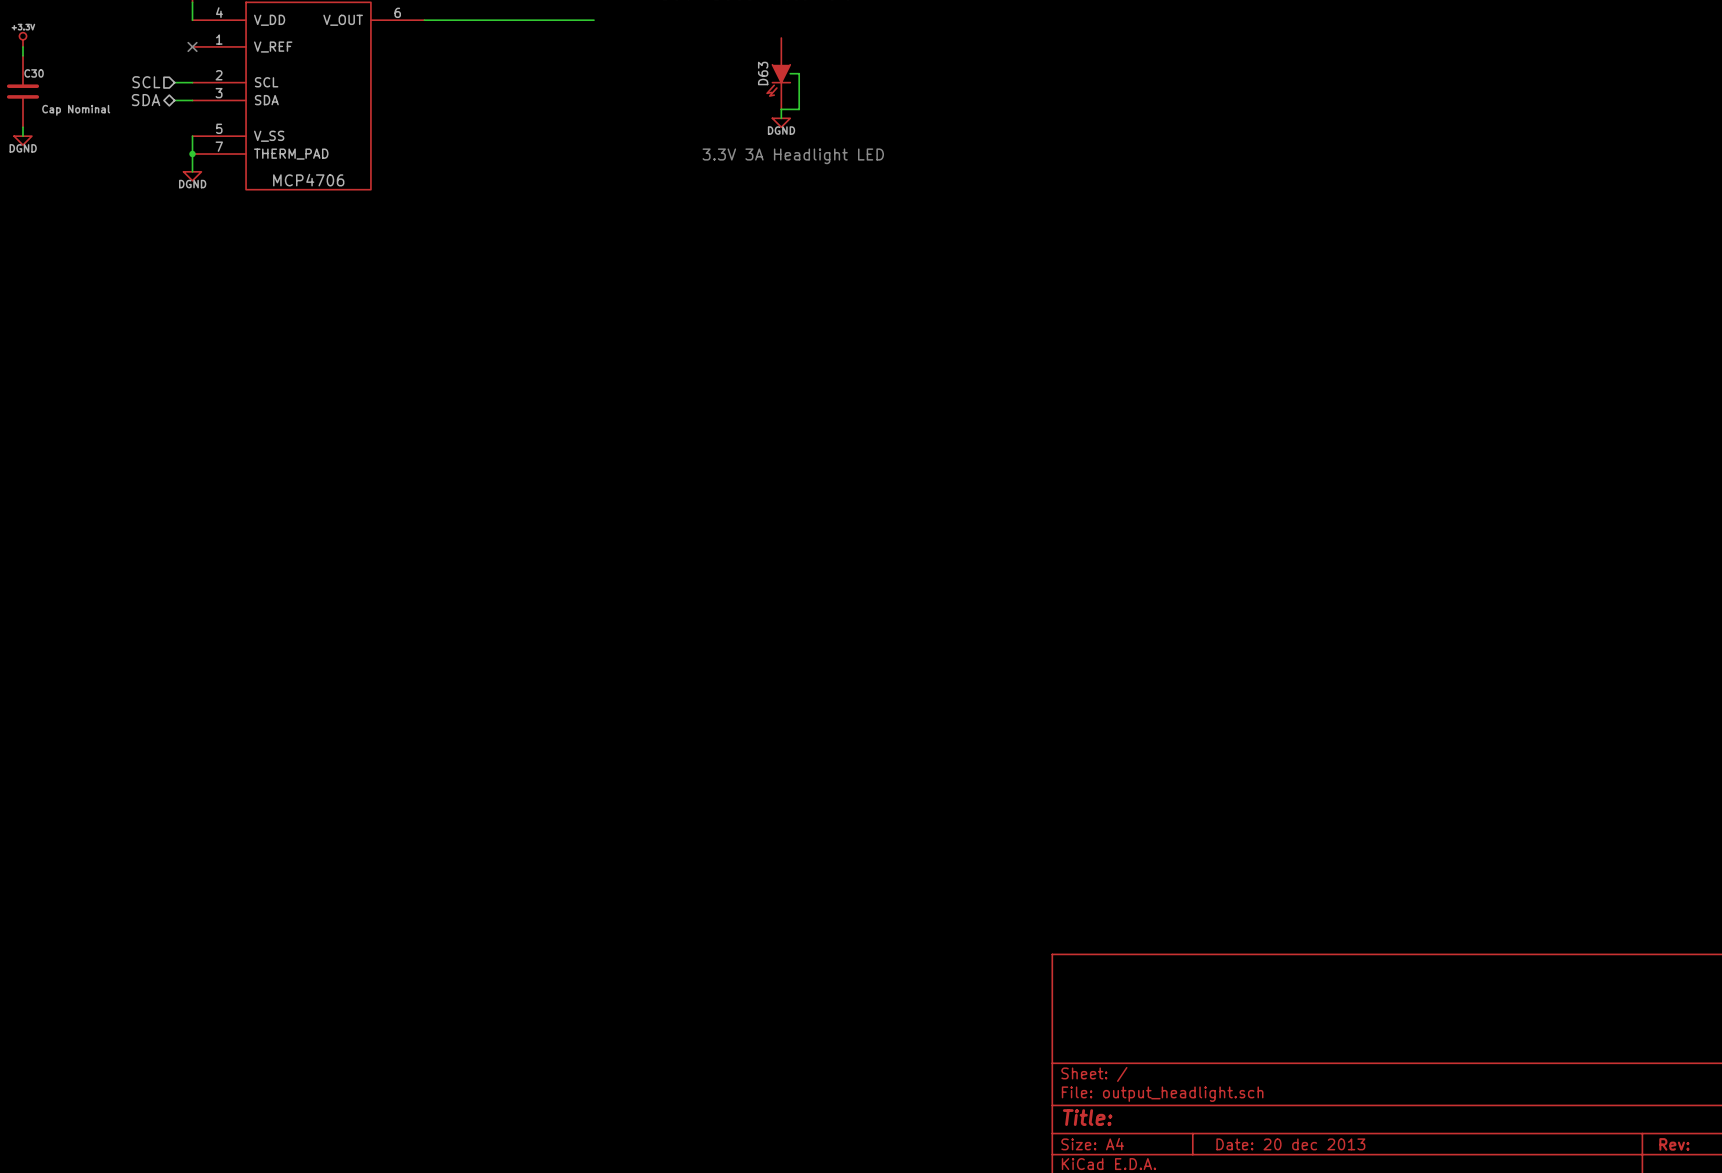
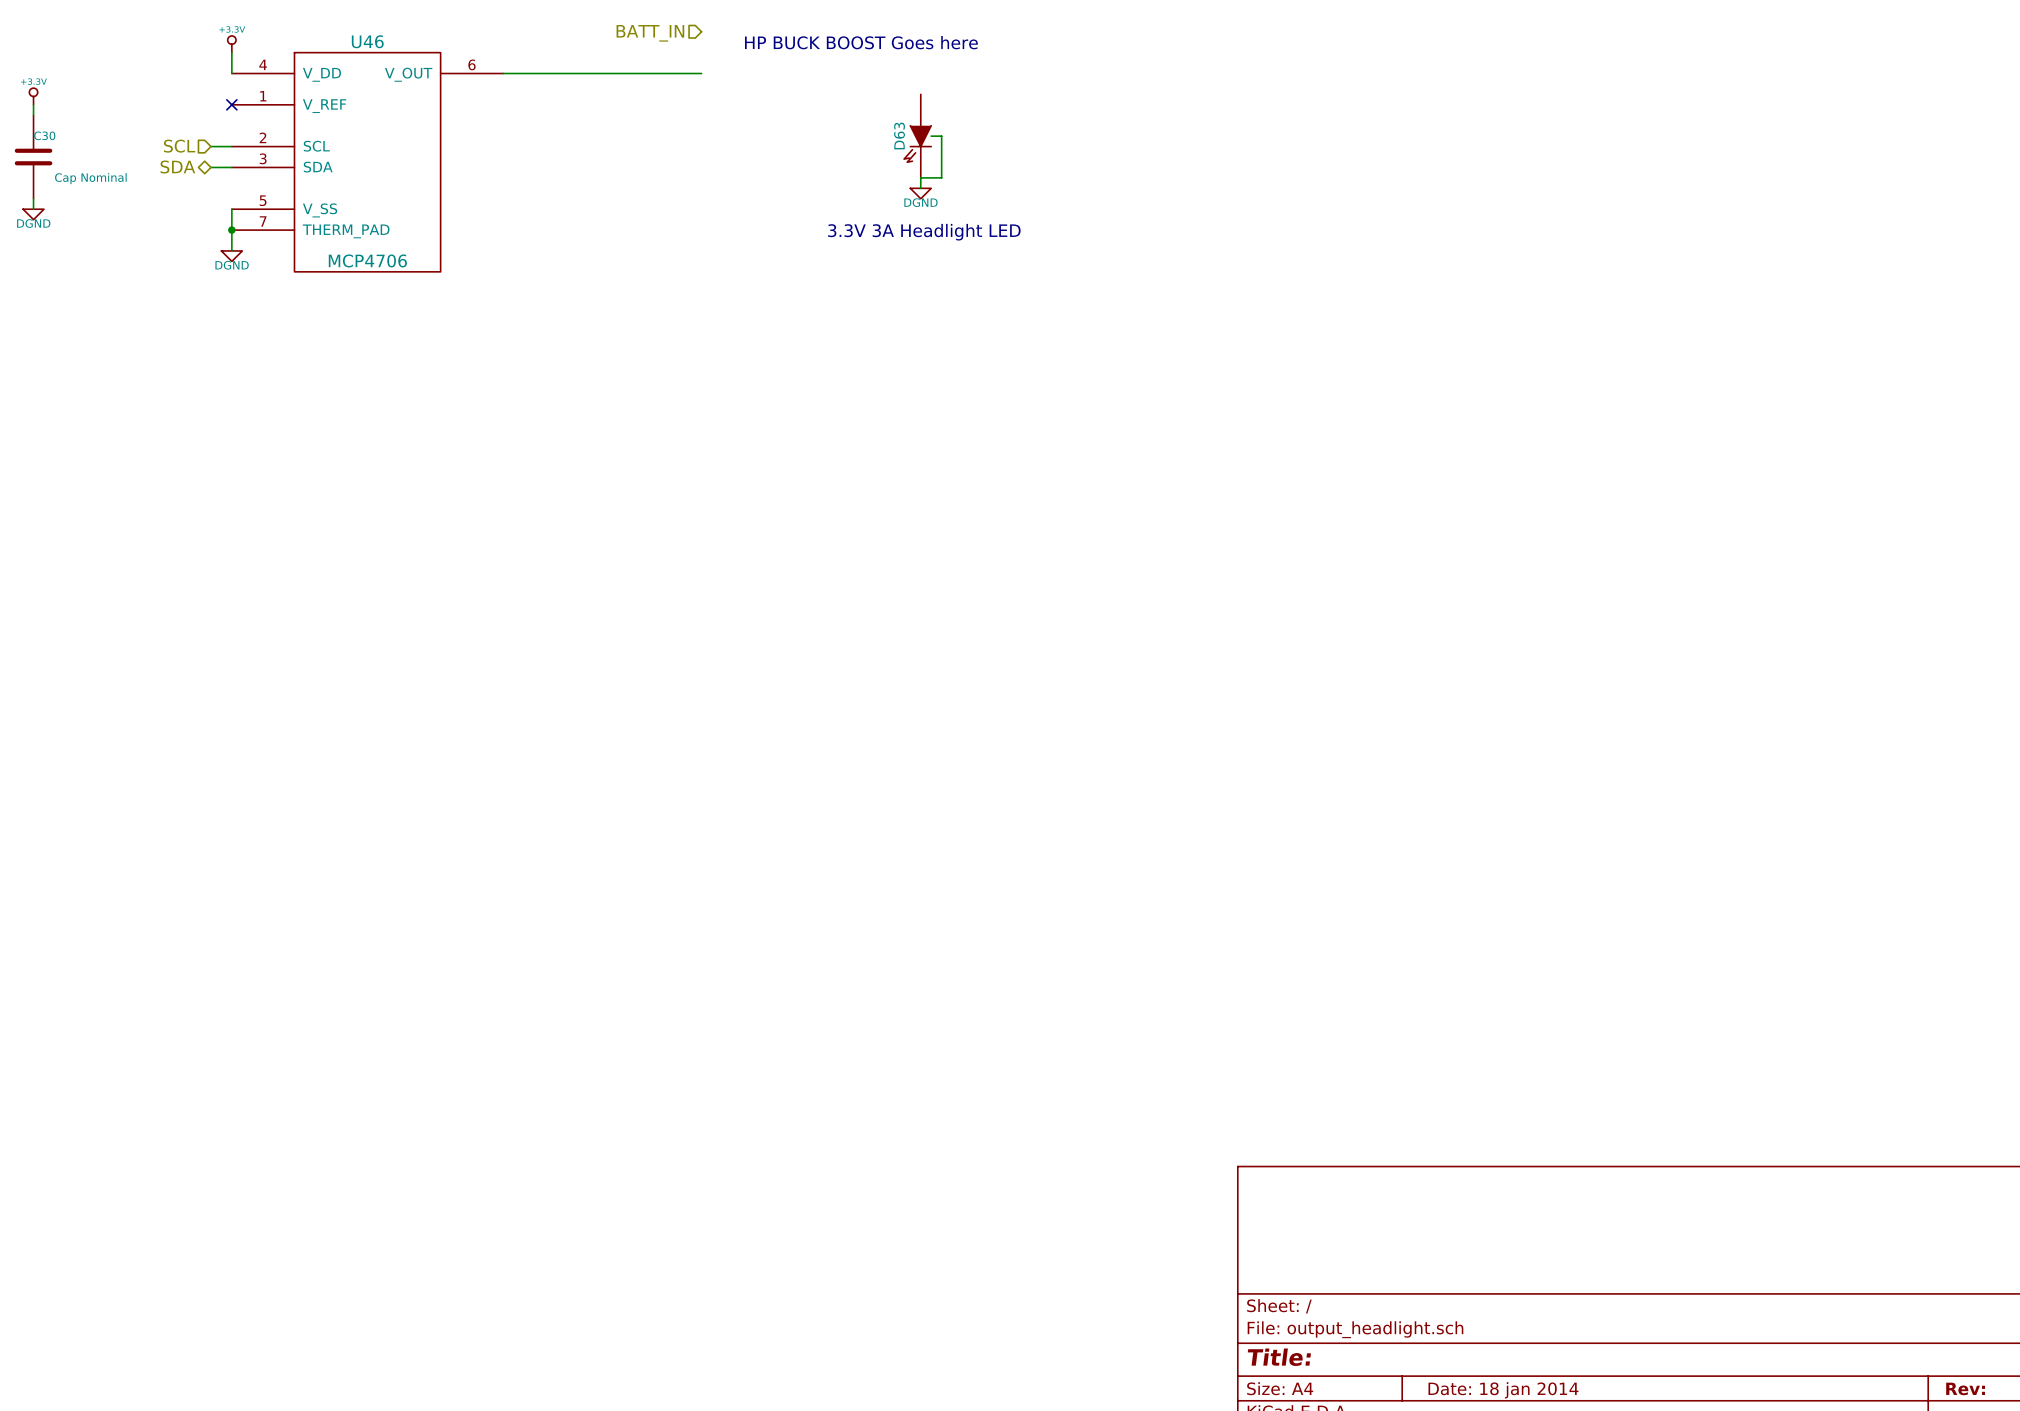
title block: Date: 20 dec 2013 (1290, 1144) -> Date: 18 jan 2014 (1503, 1390)

